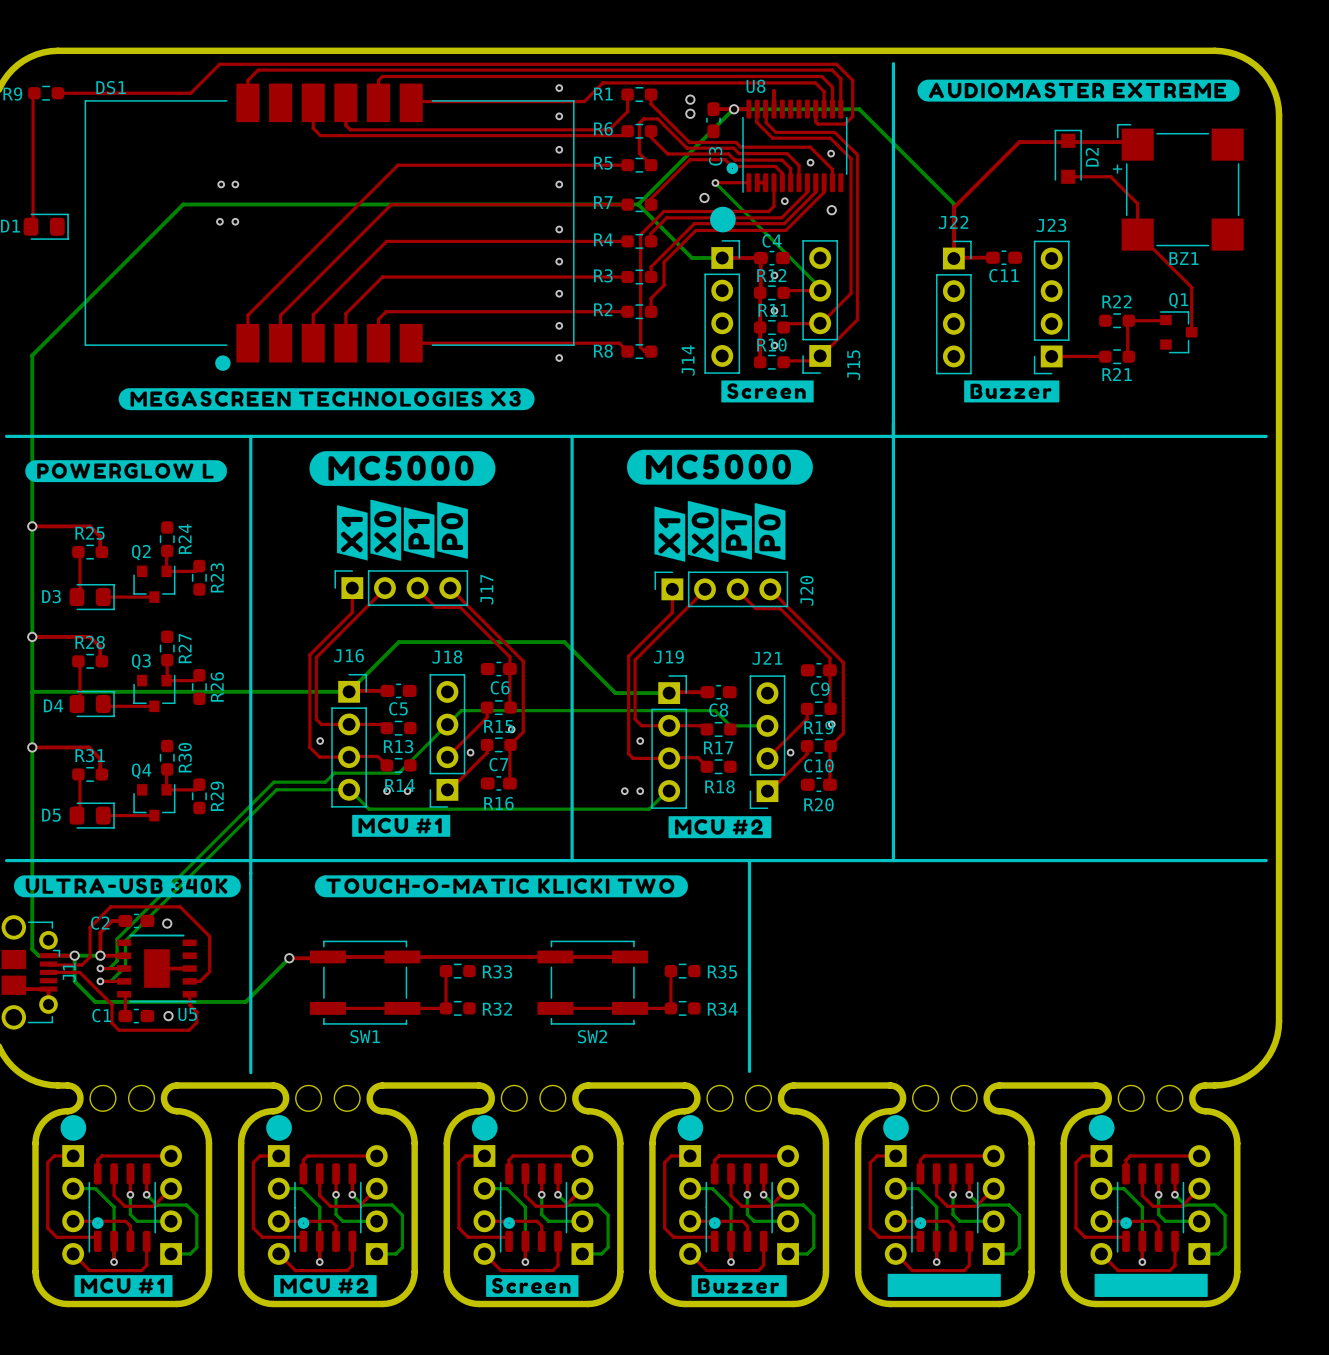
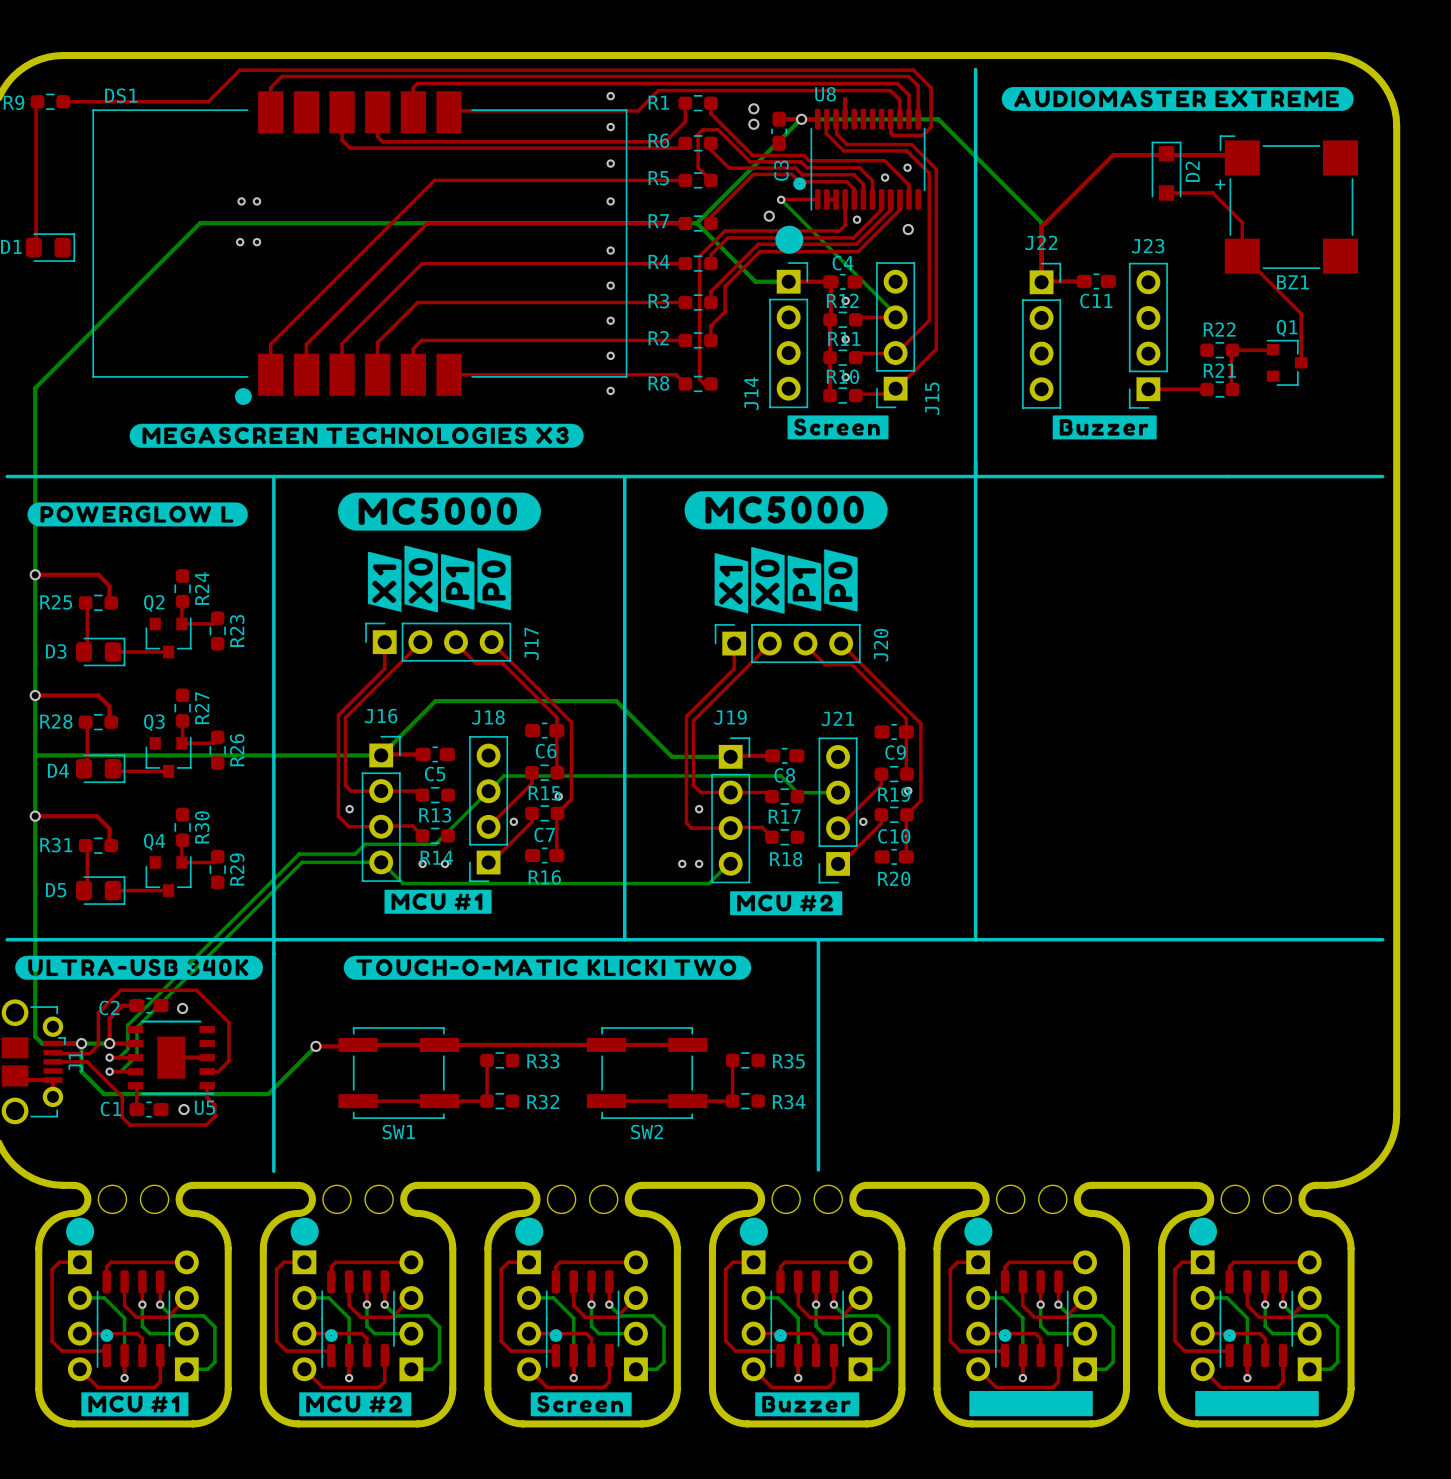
R21 name position: R21 (1117, 374) -> R21 (1219, 370)
R25 name position: R25 (90, 533) -> R25 (56, 602)
R28 name position: R28 (90, 642) -> R28 (56, 721)
R31 name position: R31 (90, 755) -> R31 (56, 845)

